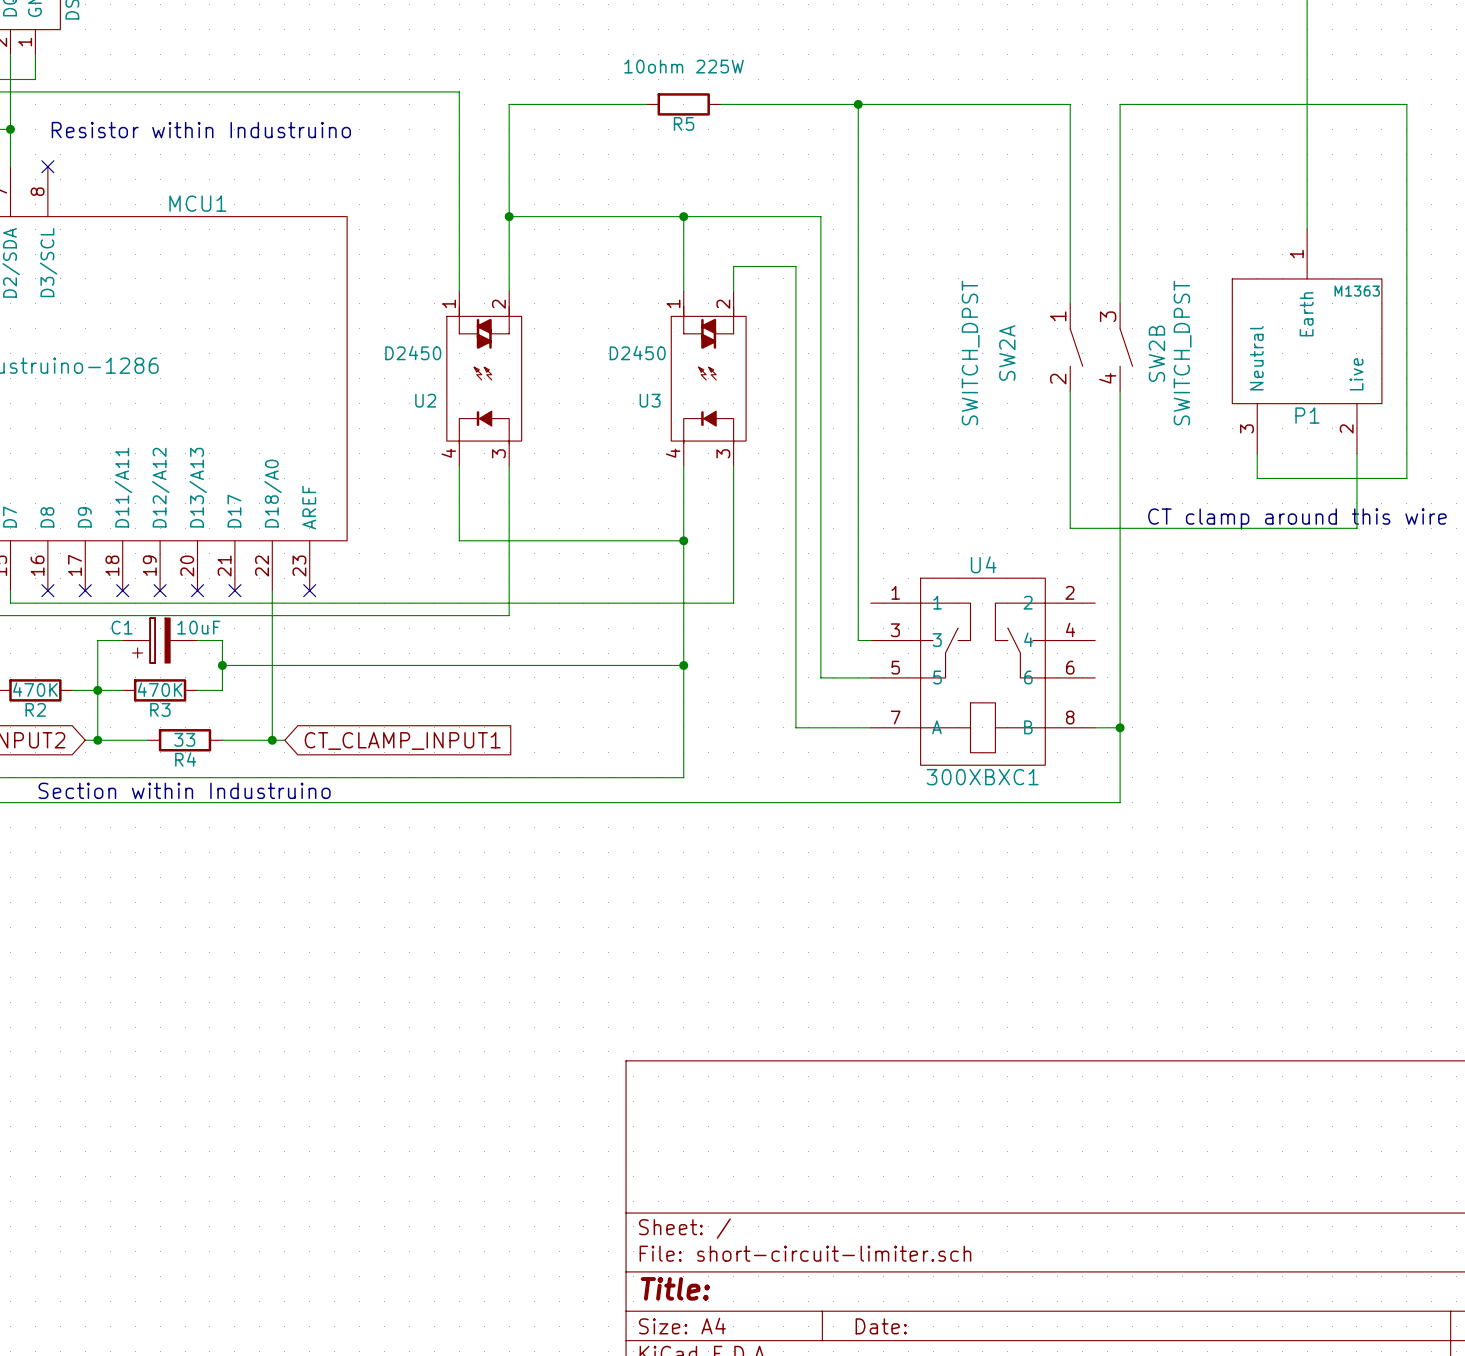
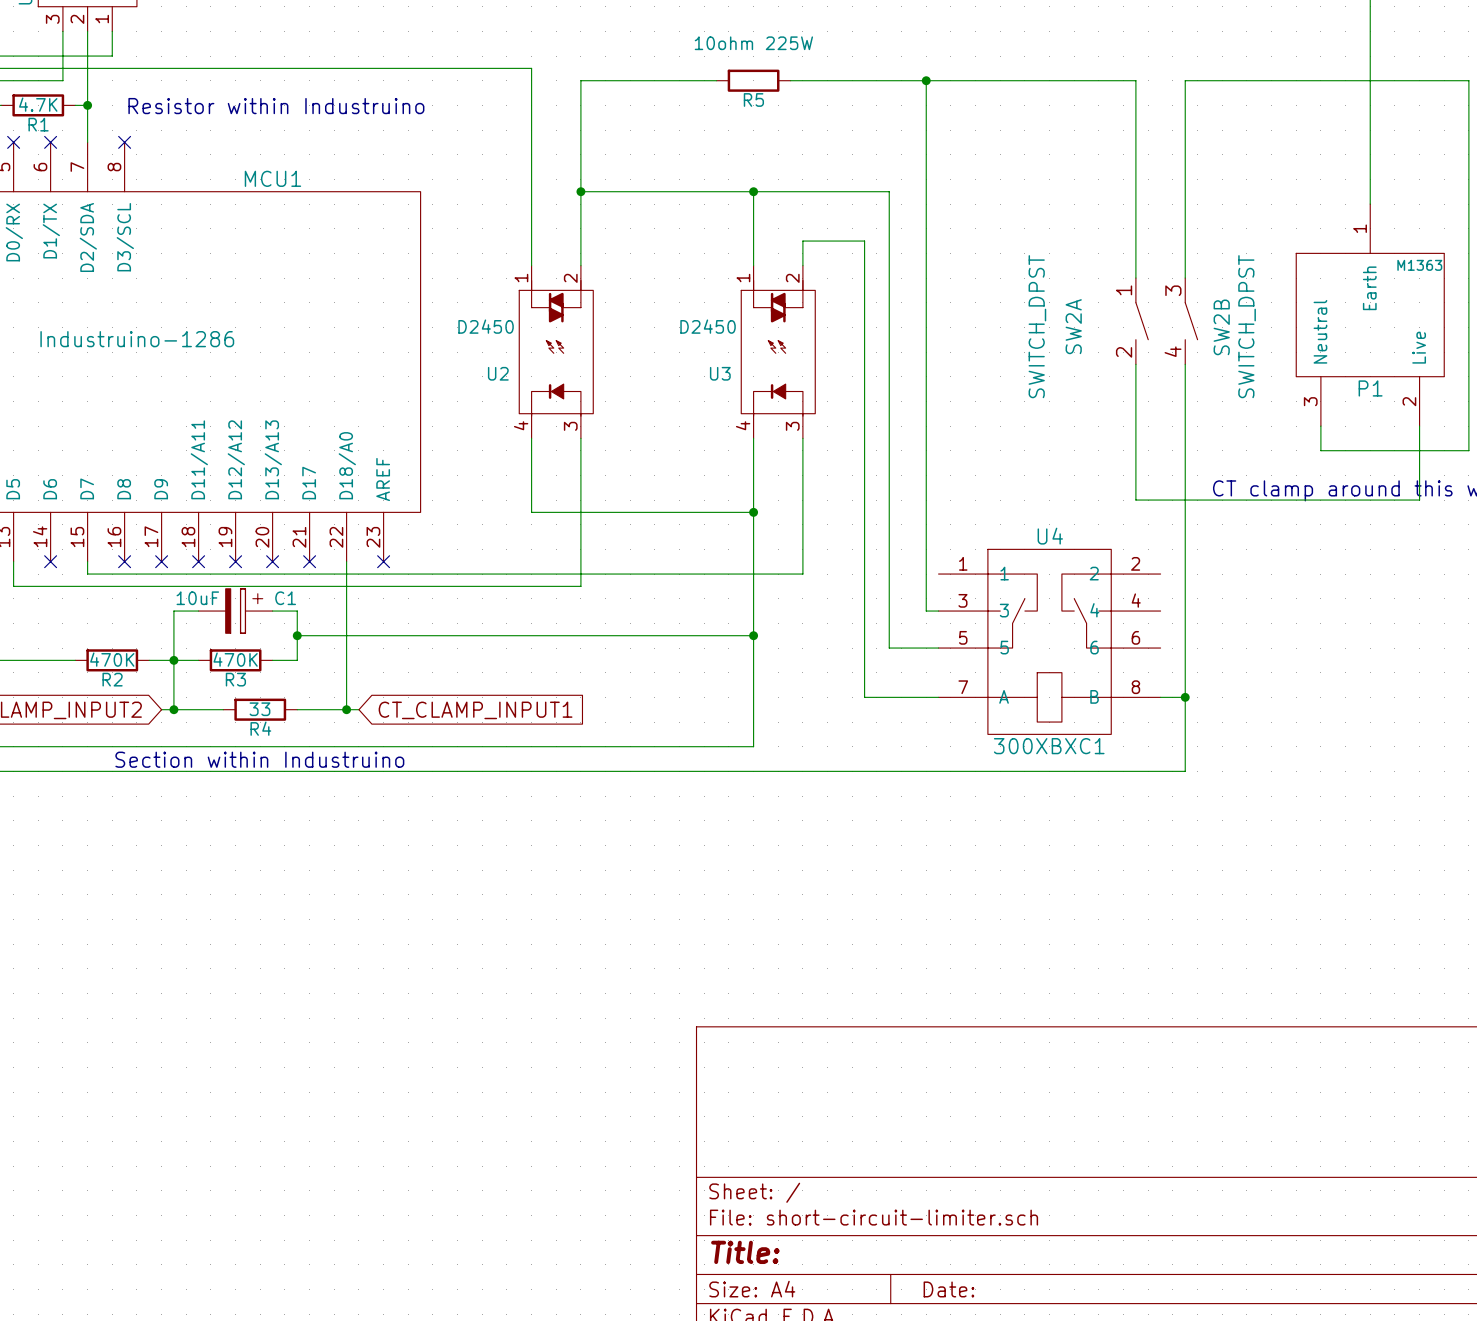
C1 name position: C1 (122, 627) -> C1 (285, 598)
C1 value position: 10uF (198, 627) -> 10uF (197, 598)
C1 rotation: 0° (151, 640) -> 180° (244, 611)

